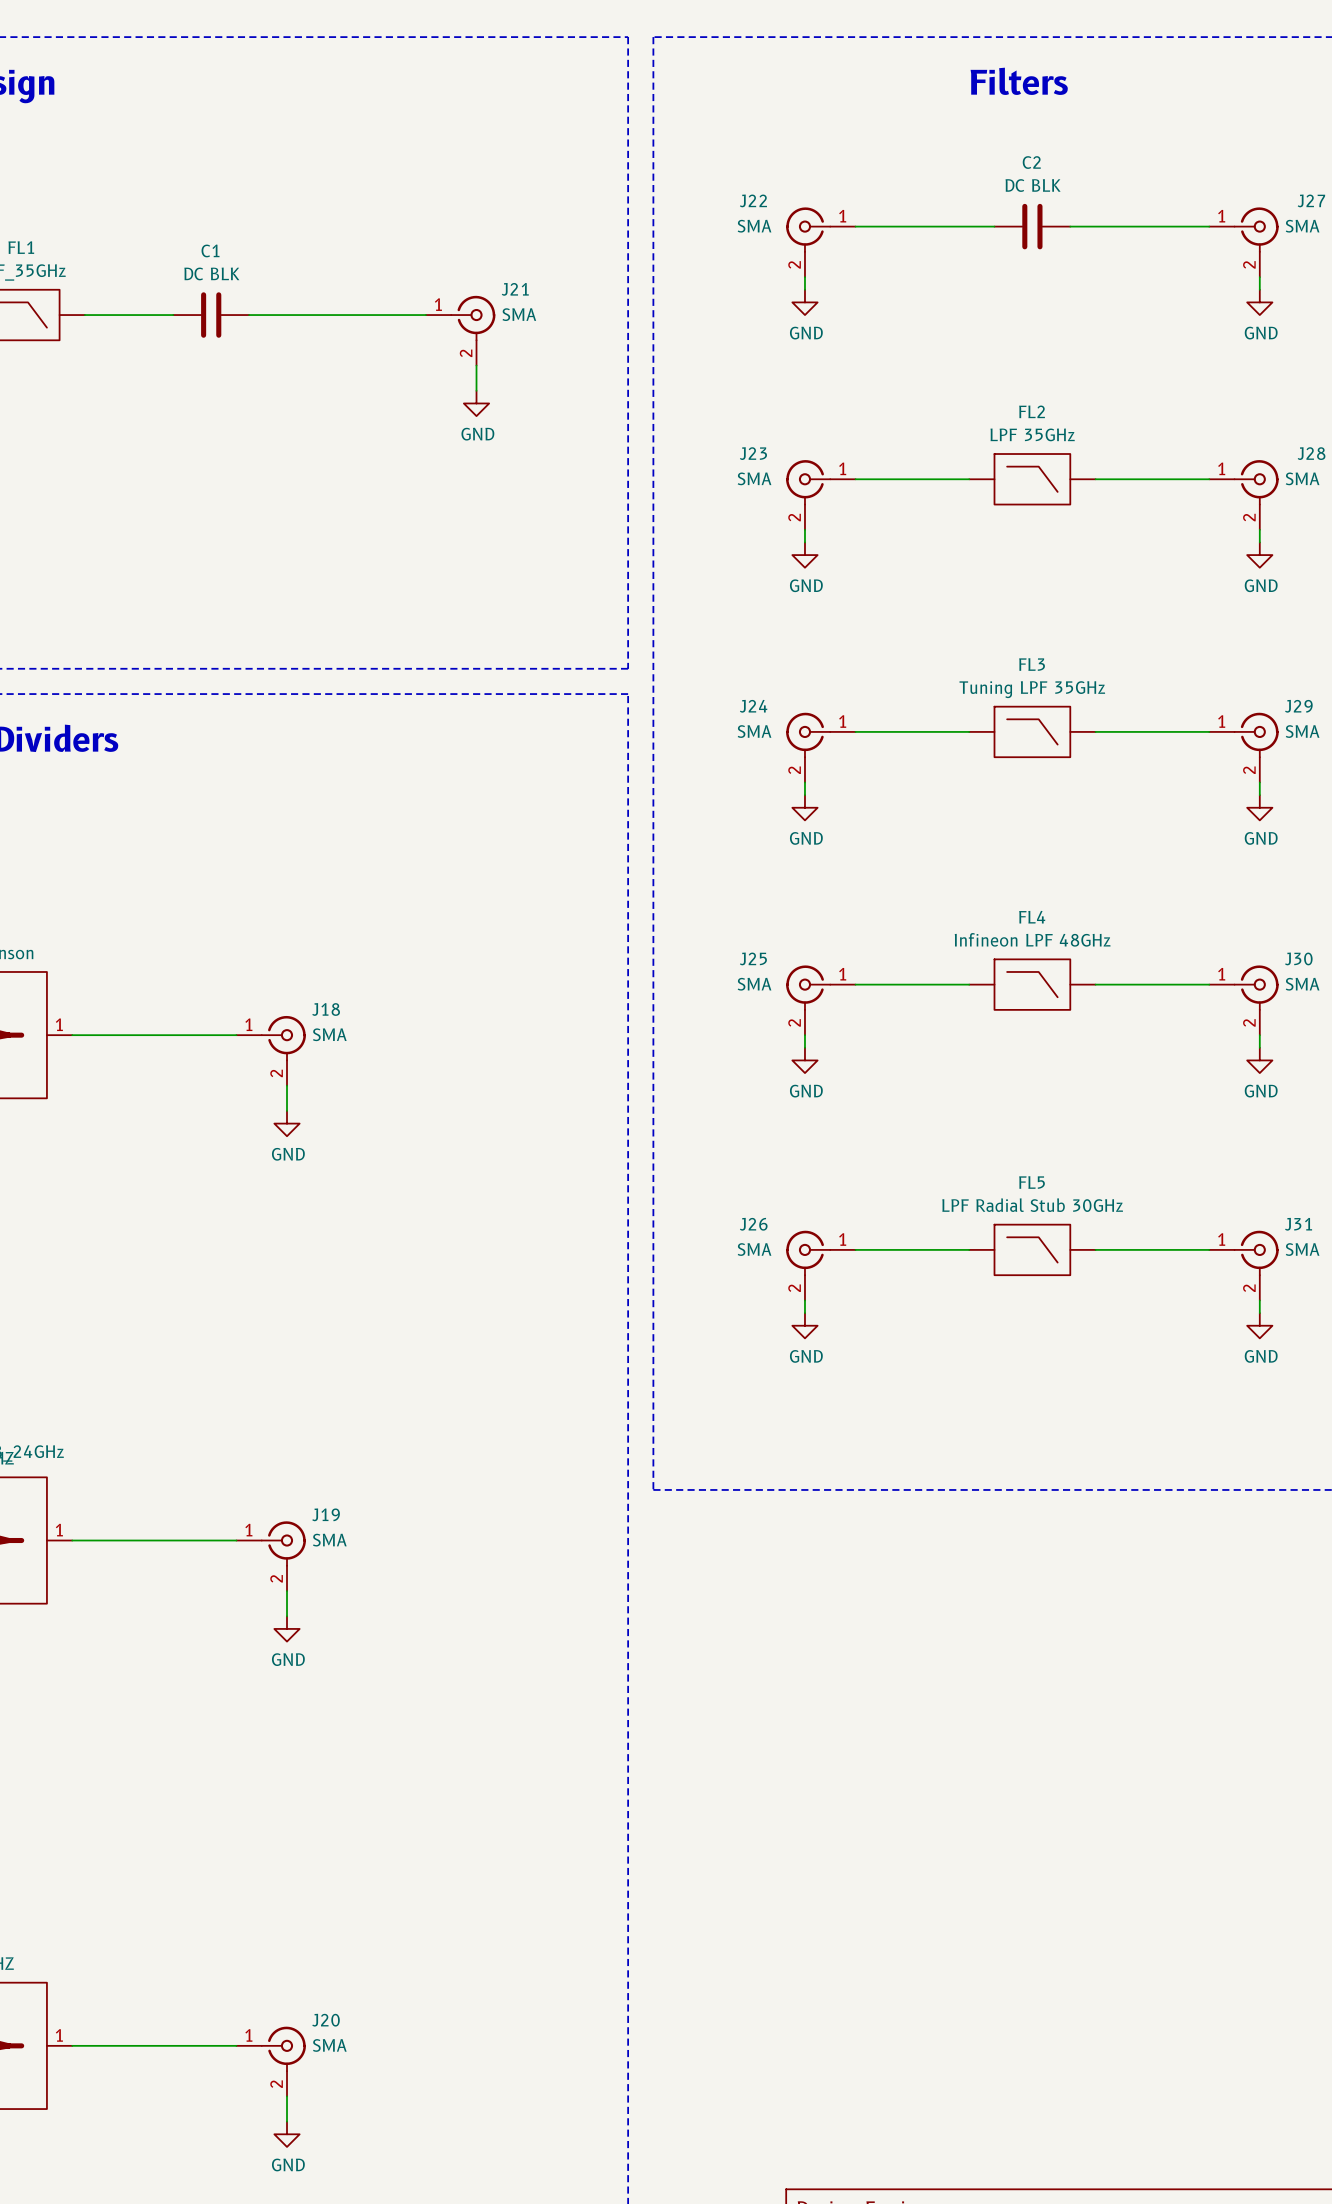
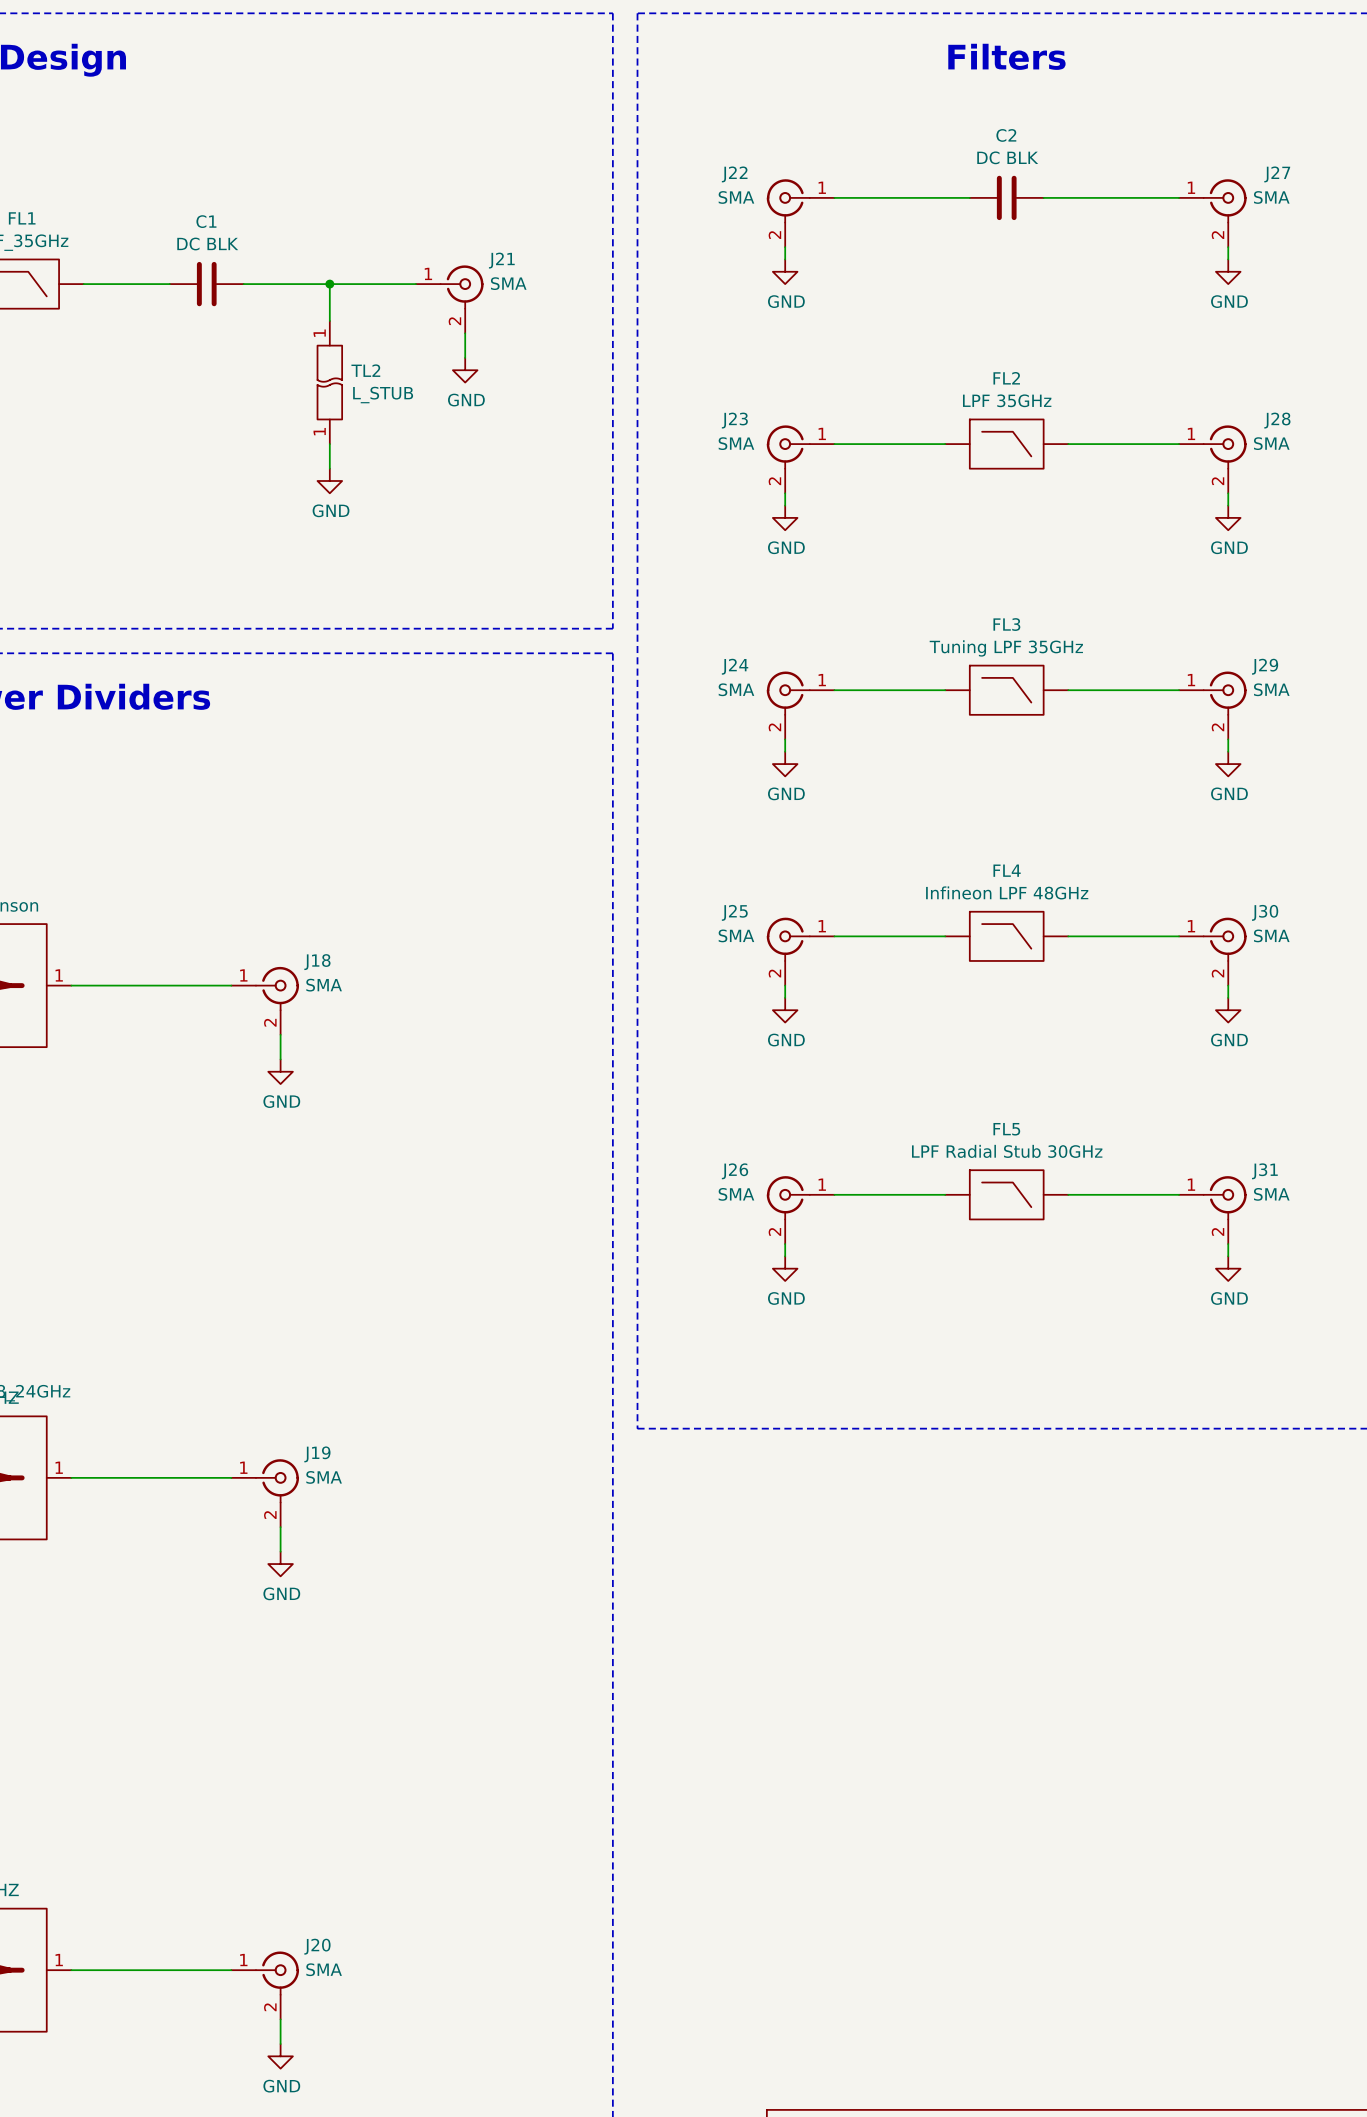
wire: none -> (329, 284) (329, 321)
junction: none -> (329, 284)
TL2: none -> L_STUB (329, 382)
wire: none -> (329, 444) (329, 468)
power symbol: none -> GND (329, 480)

